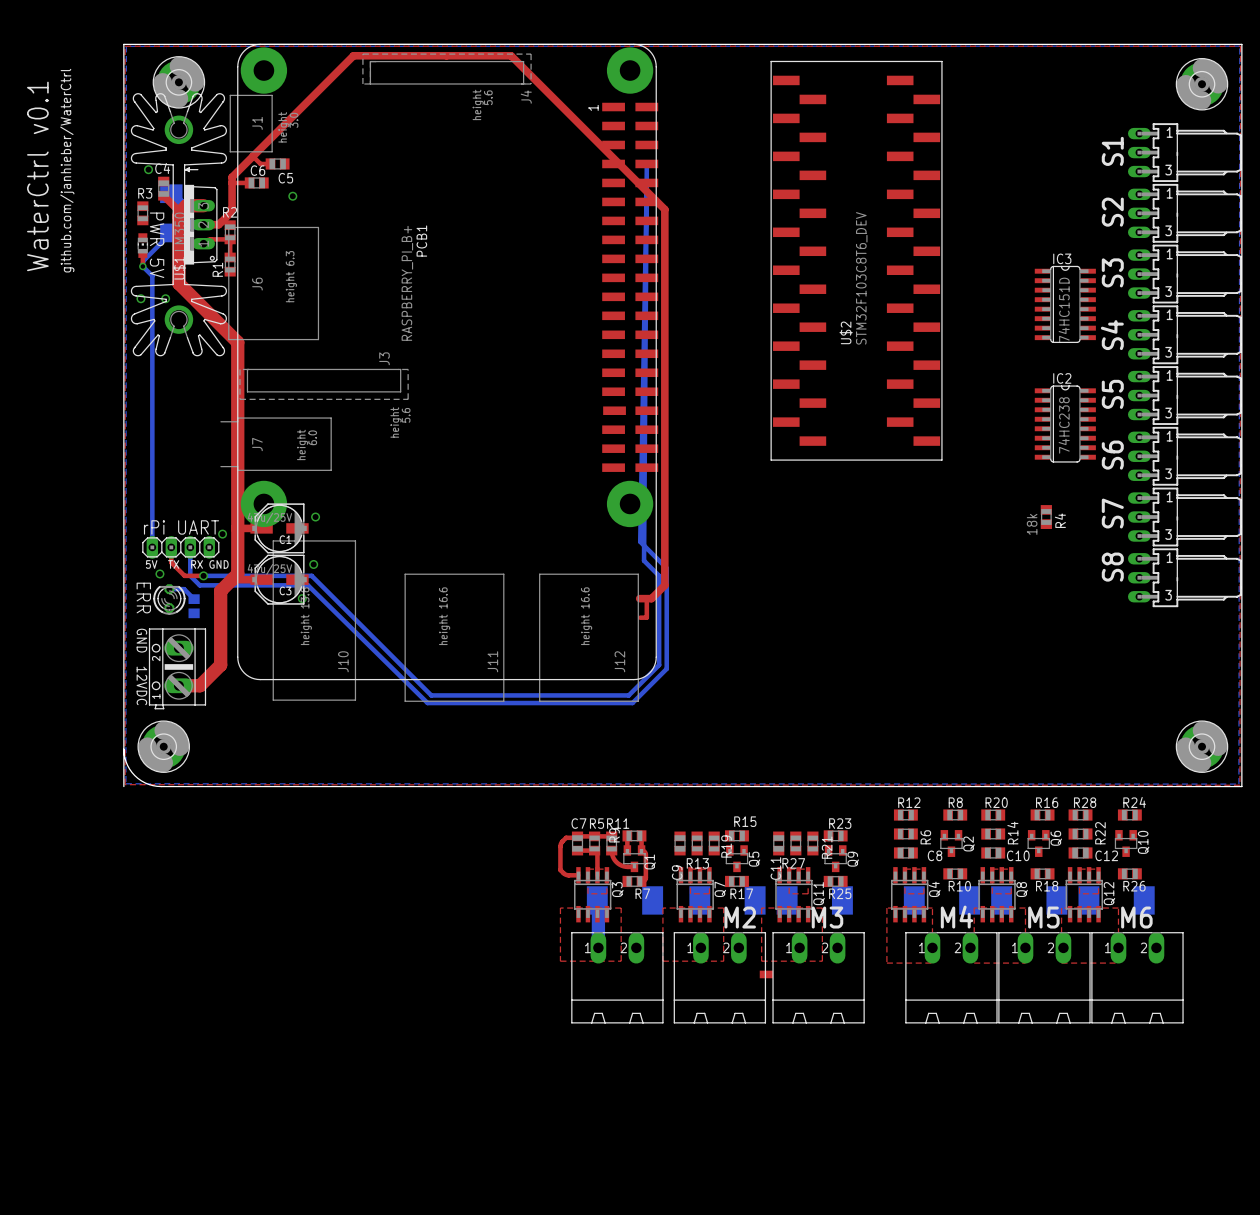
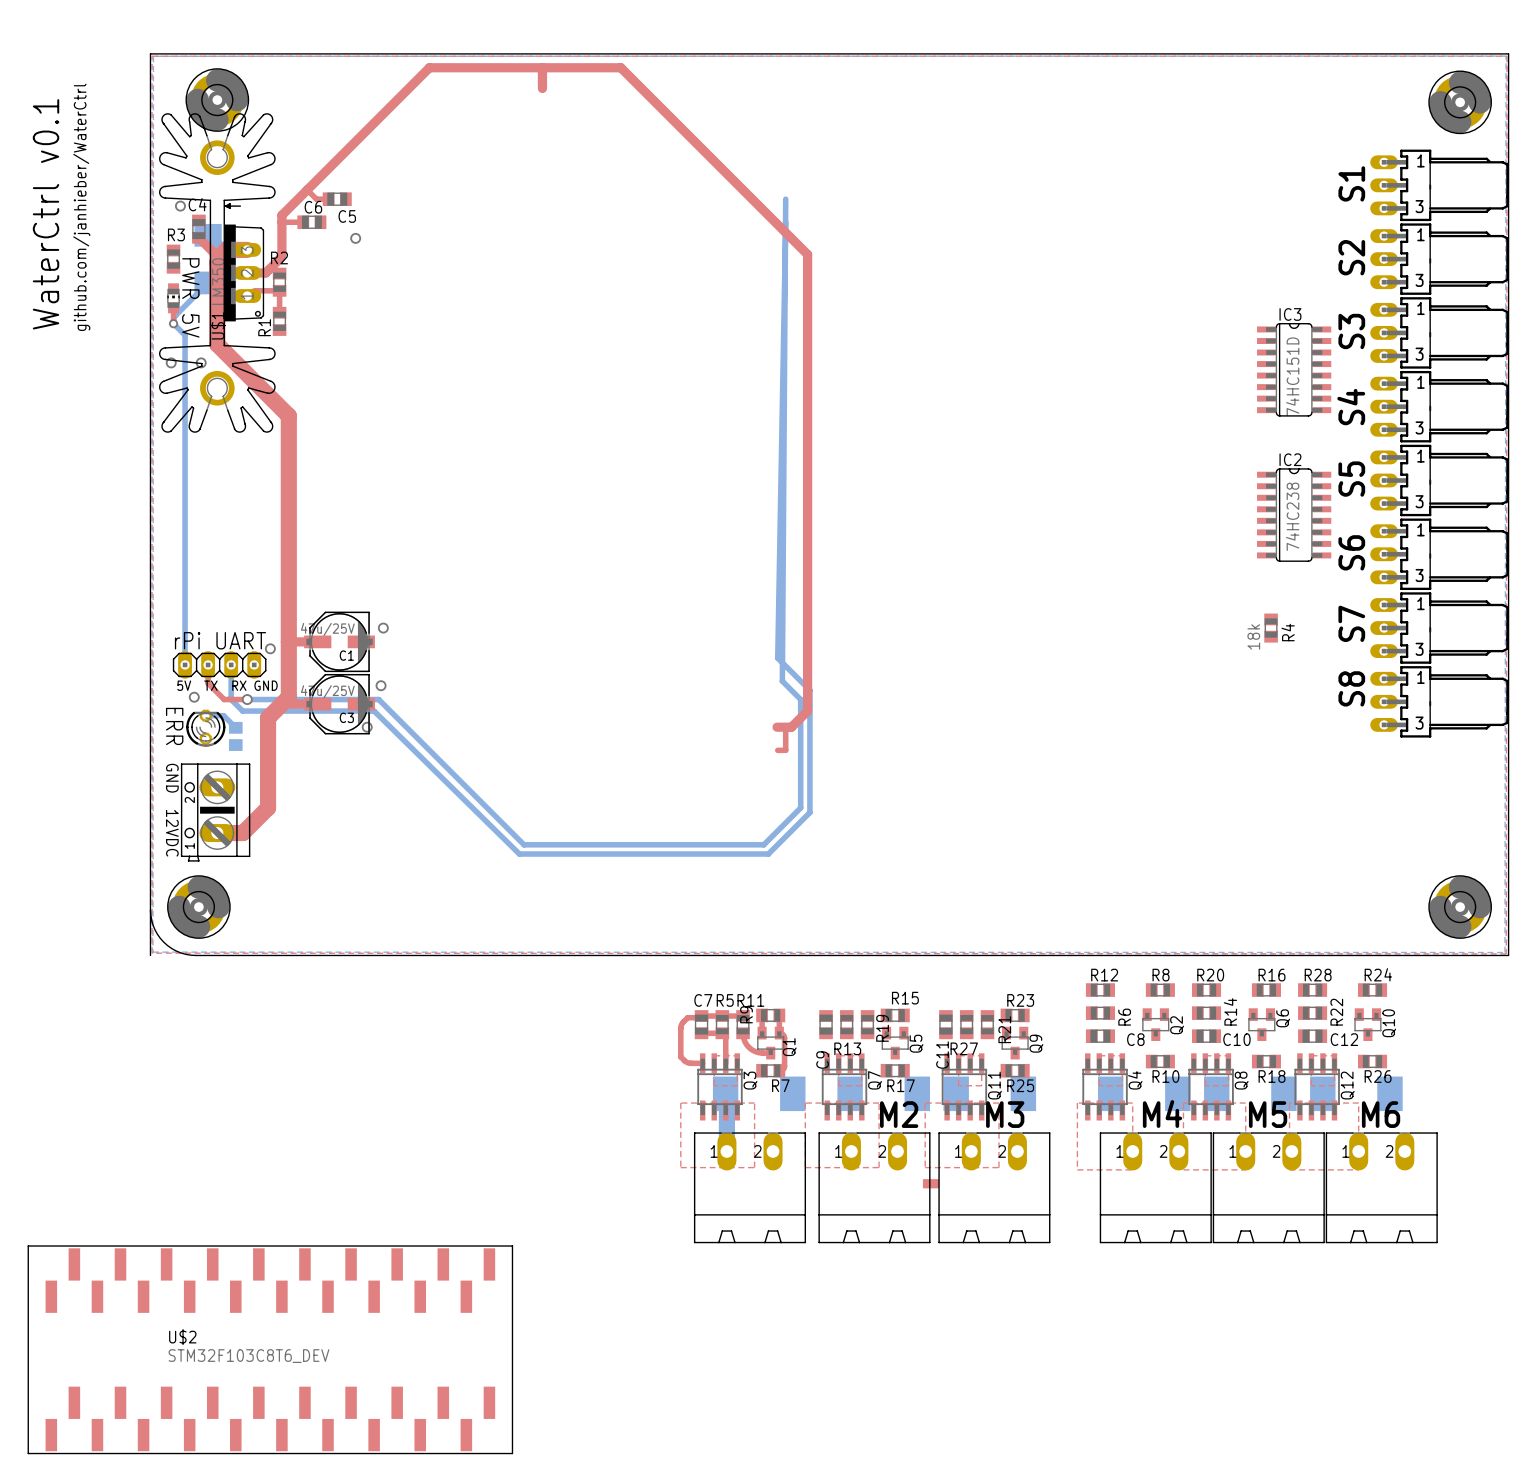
top track: none -> (542, 67) (542, 88)
U$2 rotation: 0° (856, 260) -> 90° clockwise (270, 1349)
U$2 position: (856, 260) -> (270, 1349)
PCB1: RASPBERRY_PI_B+ (439, 372) -> none

